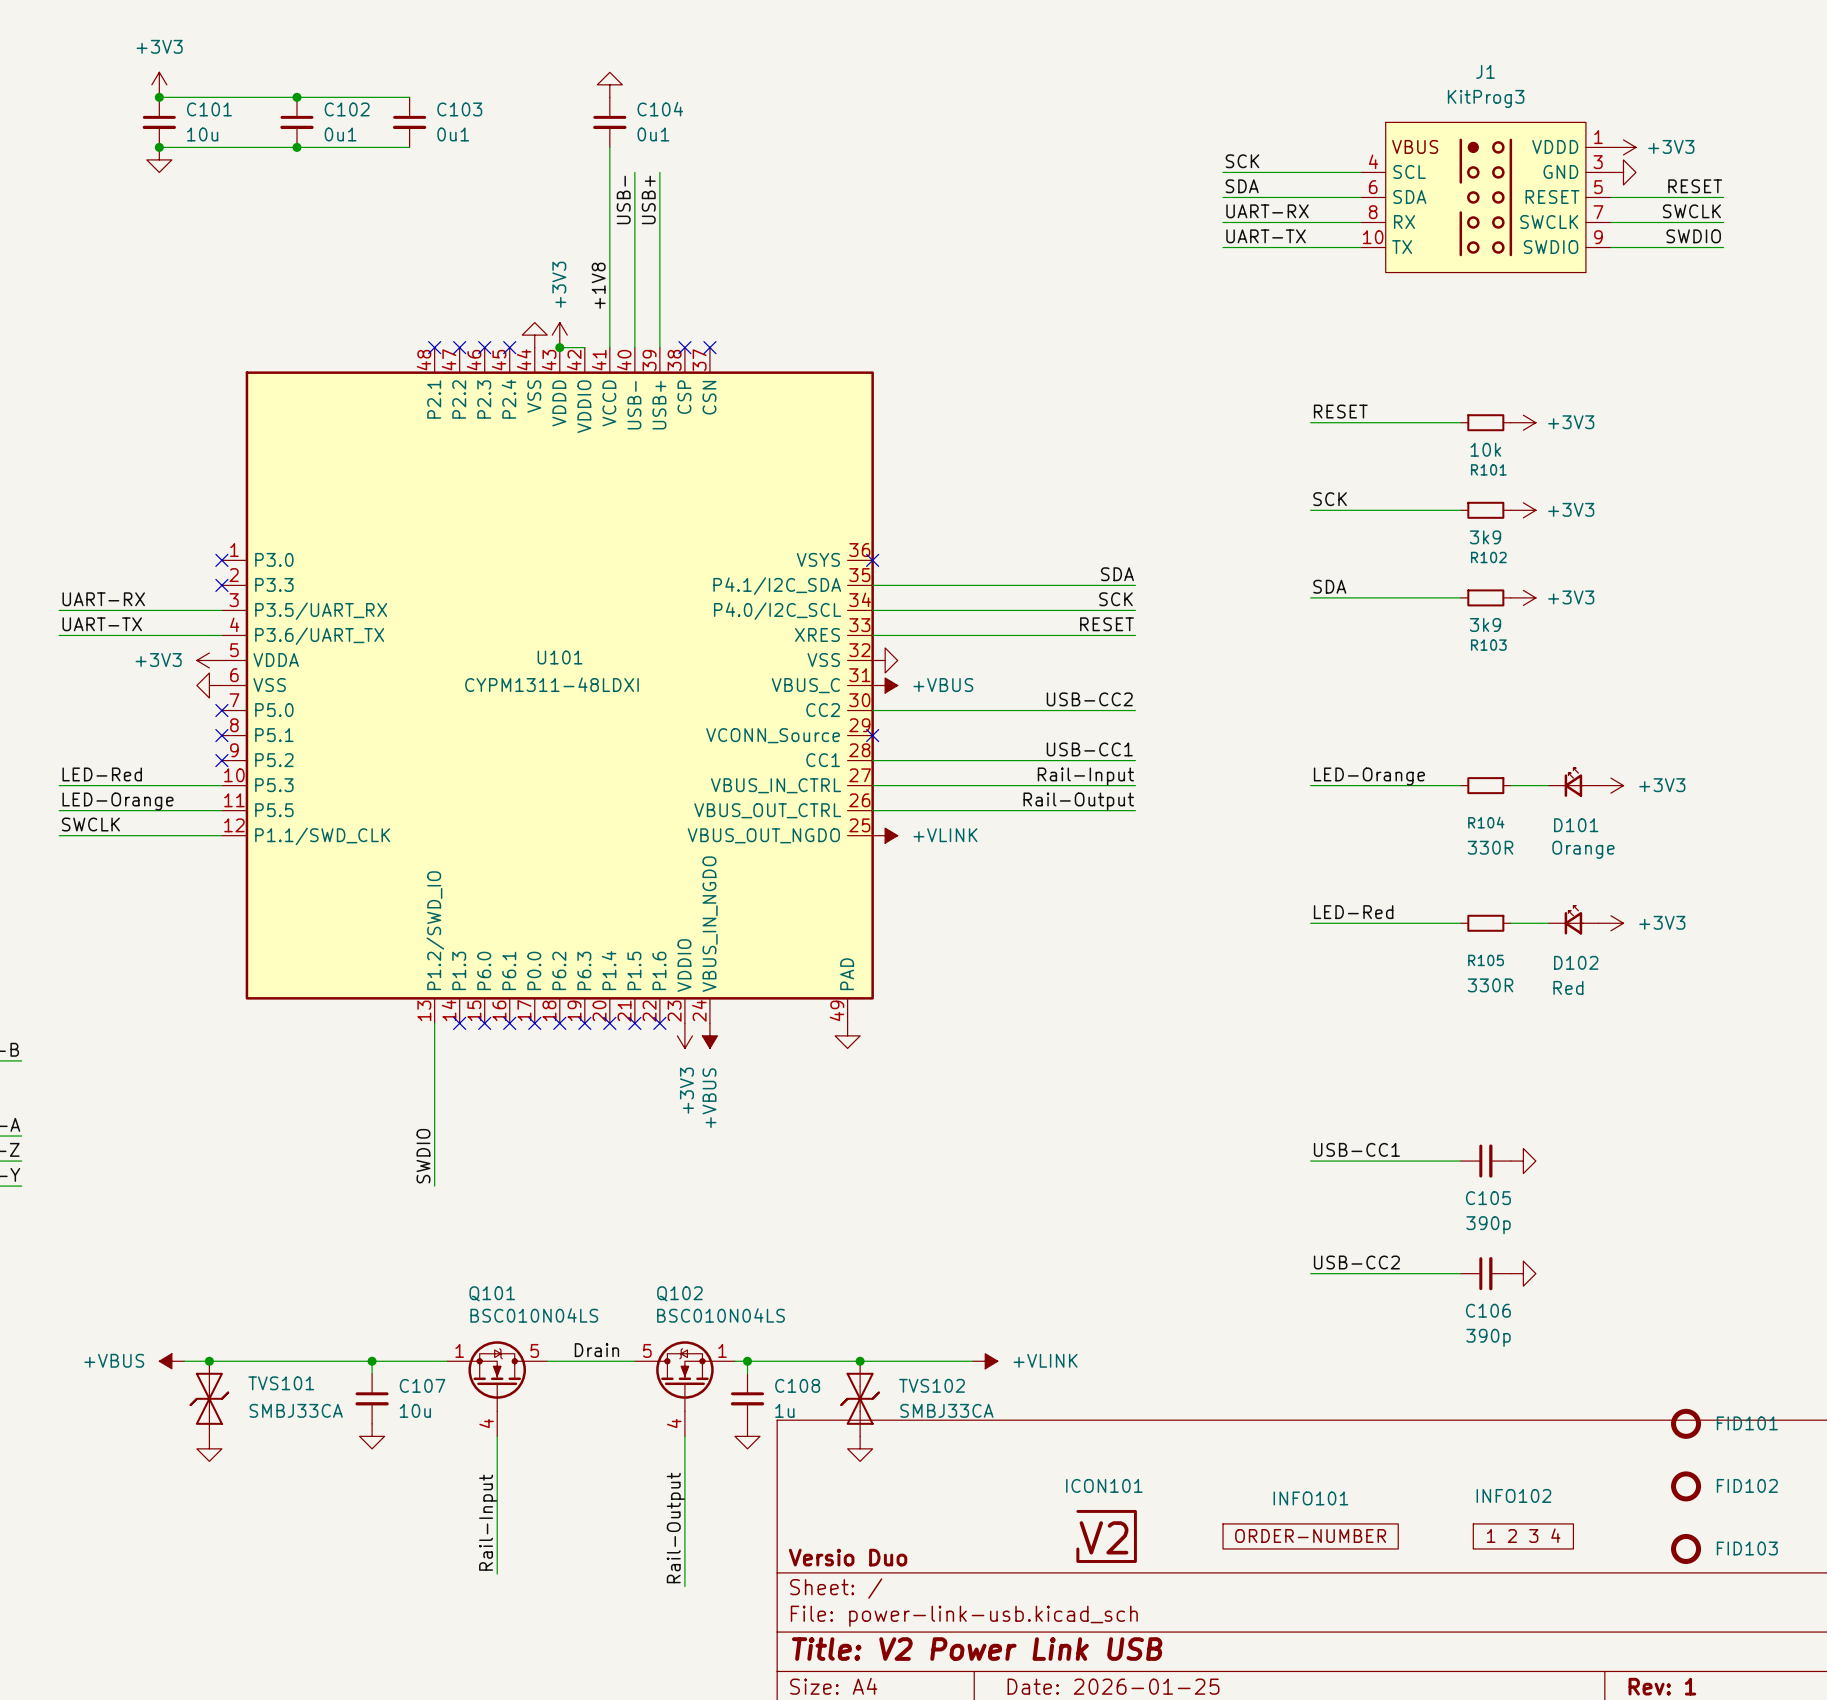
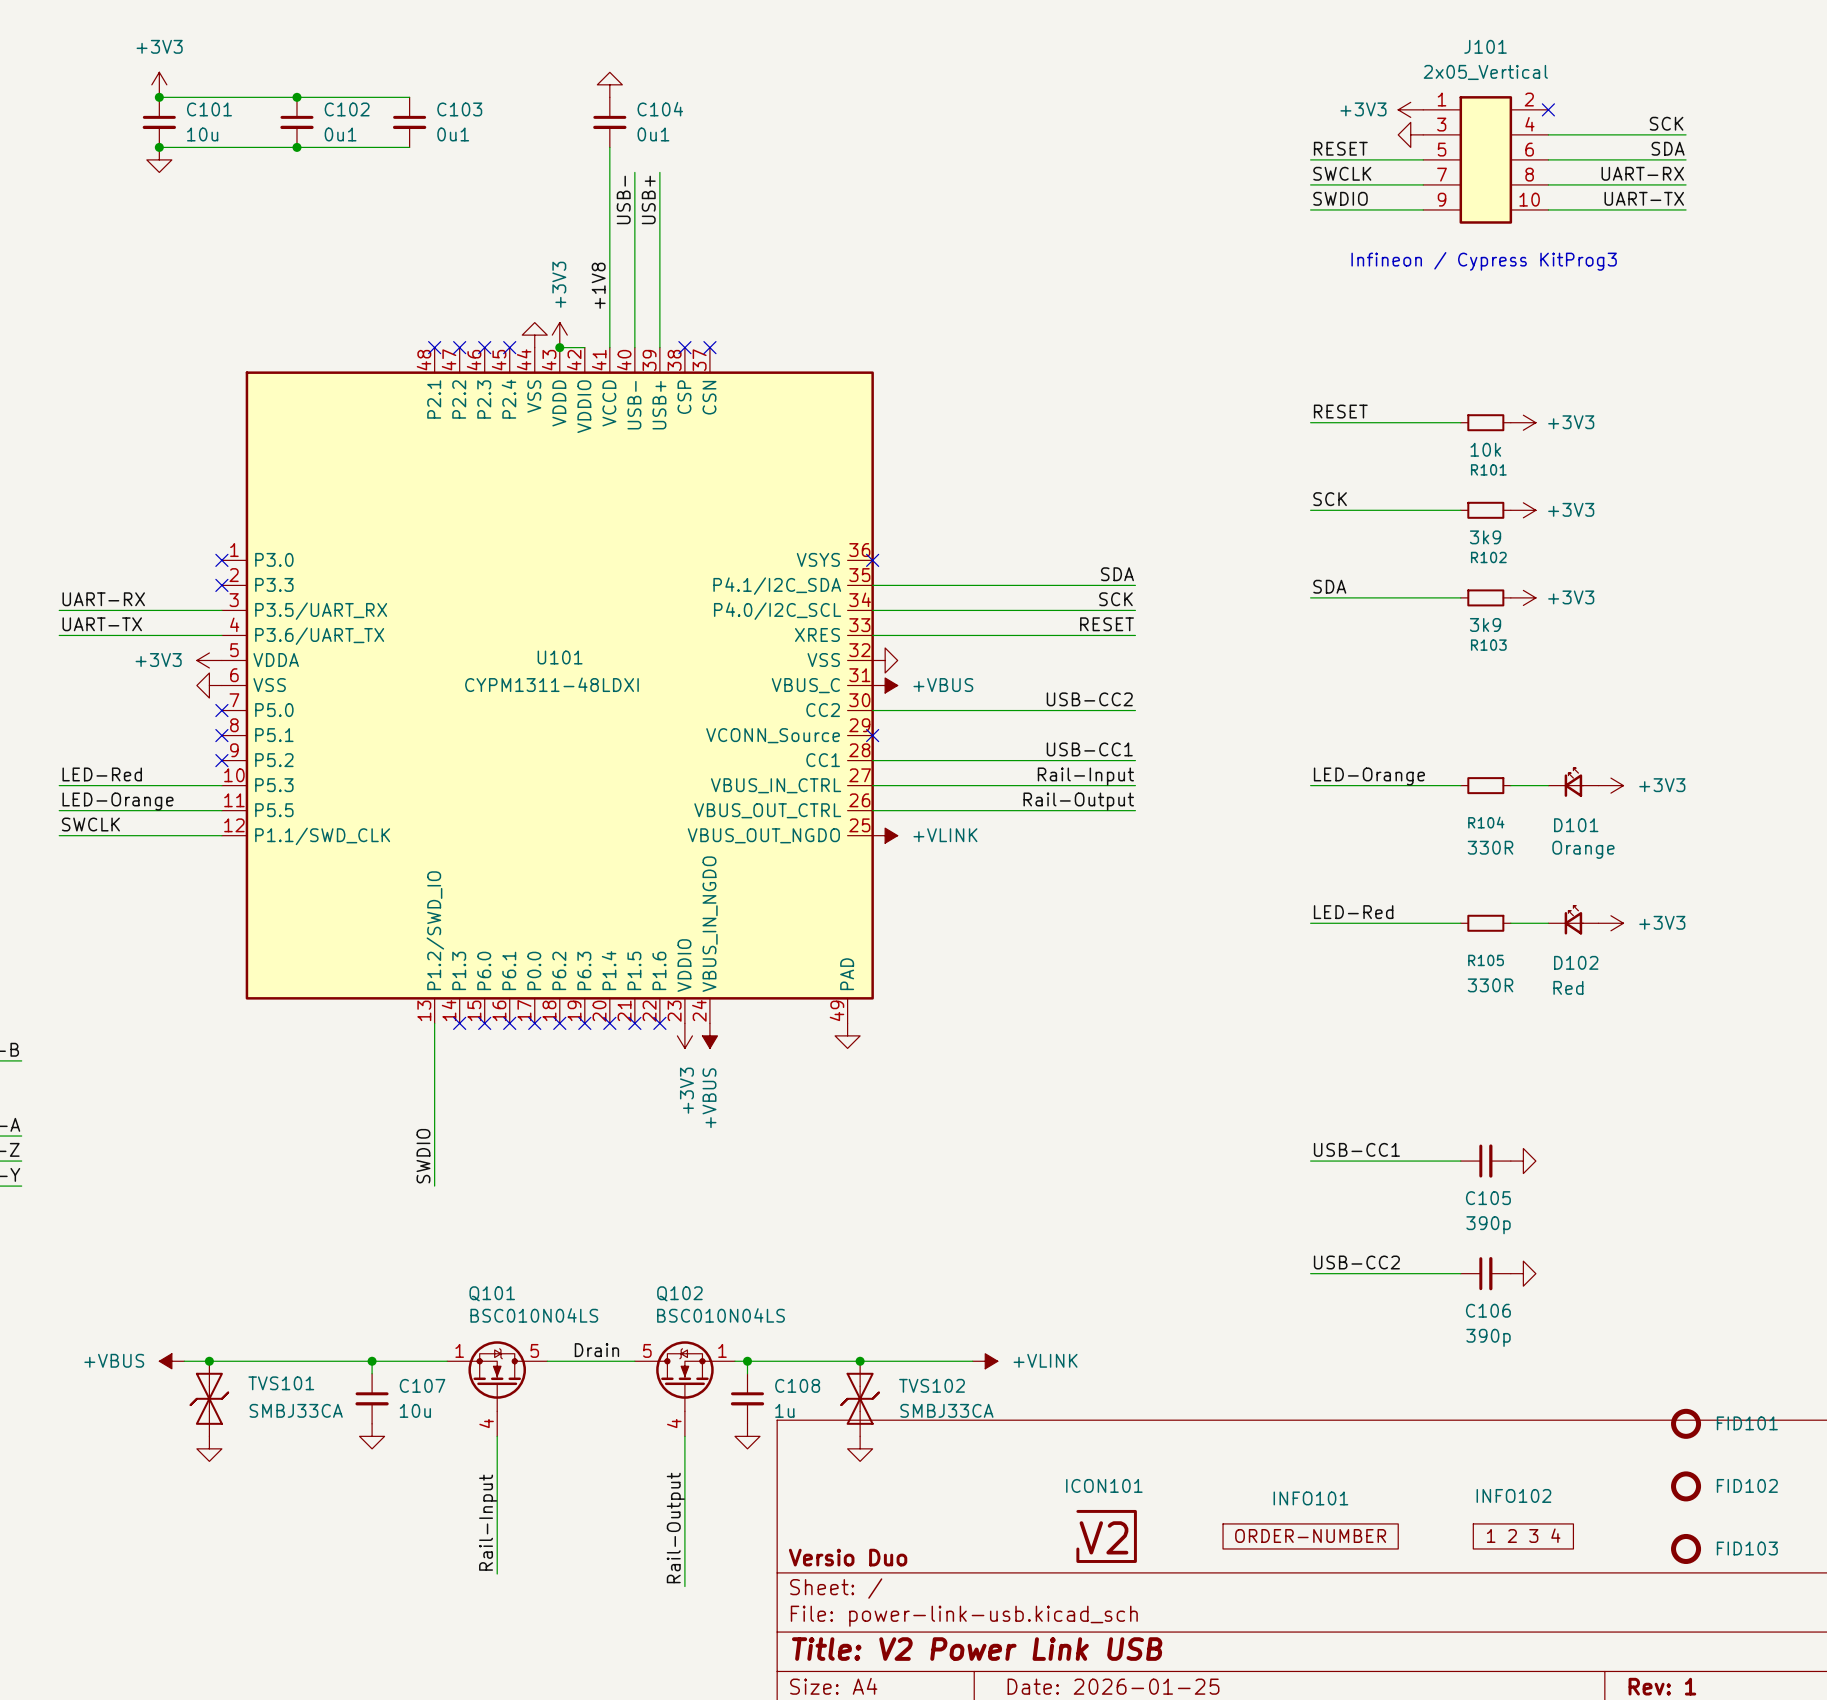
no-connect mark: none -> (1548, 109)
label: none -> SCK (1666, 123)
wire: none -> (1548, 134) (1686, 134)
power symbol rotation: 0° (1623, 147) -> 180° (1410, 109)
power symbol position: +3V3 (1623, 147) -> +3V3 (1410, 109)
label: none -> RESET (1340, 148)
label: none -> SDA (1668, 148)
wire: none -> (1310, 159) (1423, 159)
J101: none -> 2x05_Vertical (1485, 159)
wire: none -> (1548, 159) (1686, 159)
label: SCK (1242, 161) -> none
wire: (1223, 172) (1360, 172) -> none
power symbol rotation: 0° (1623, 172) -> 180° (1410, 134)
power symbol position: (1623, 172) -> (1410, 134)
label: none -> SWCLK (1342, 173)
label: none -> UART-RX (1642, 173)
wire: none -> (1310, 184) (1423, 184)
wire: none -> (1548, 184) (1686, 184)
label: SDA (1242, 186) -> none
label: RESET (1695, 186) -> none
wire: (1223, 197) (1360, 197) -> none
J1: KitProg3 (1485, 197) -> none
wire: (1610, 197) (1723, 197) -> none
label: none -> SWDIO (1340, 198)
label: none -> UART-TX (1644, 198)
wire: none -> (1310, 209) (1423, 209)
wire: none -> (1548, 209) (1686, 209)
label: UART-RX (1267, 211) -> none
label: SWCLK (1691, 211) -> none
wire: (1223, 222) (1360, 222) -> none
wire: (1610, 222) (1723, 222) -> none
label: UART-TX (1266, 236) -> none
label: SWDIO (1693, 236) -> none
wire: (1223, 247) (1360, 247) -> none
wire: (1610, 247) (1723, 247) -> none
text: none -> Infineon / Cypress KitProg3 (1484, 261)

